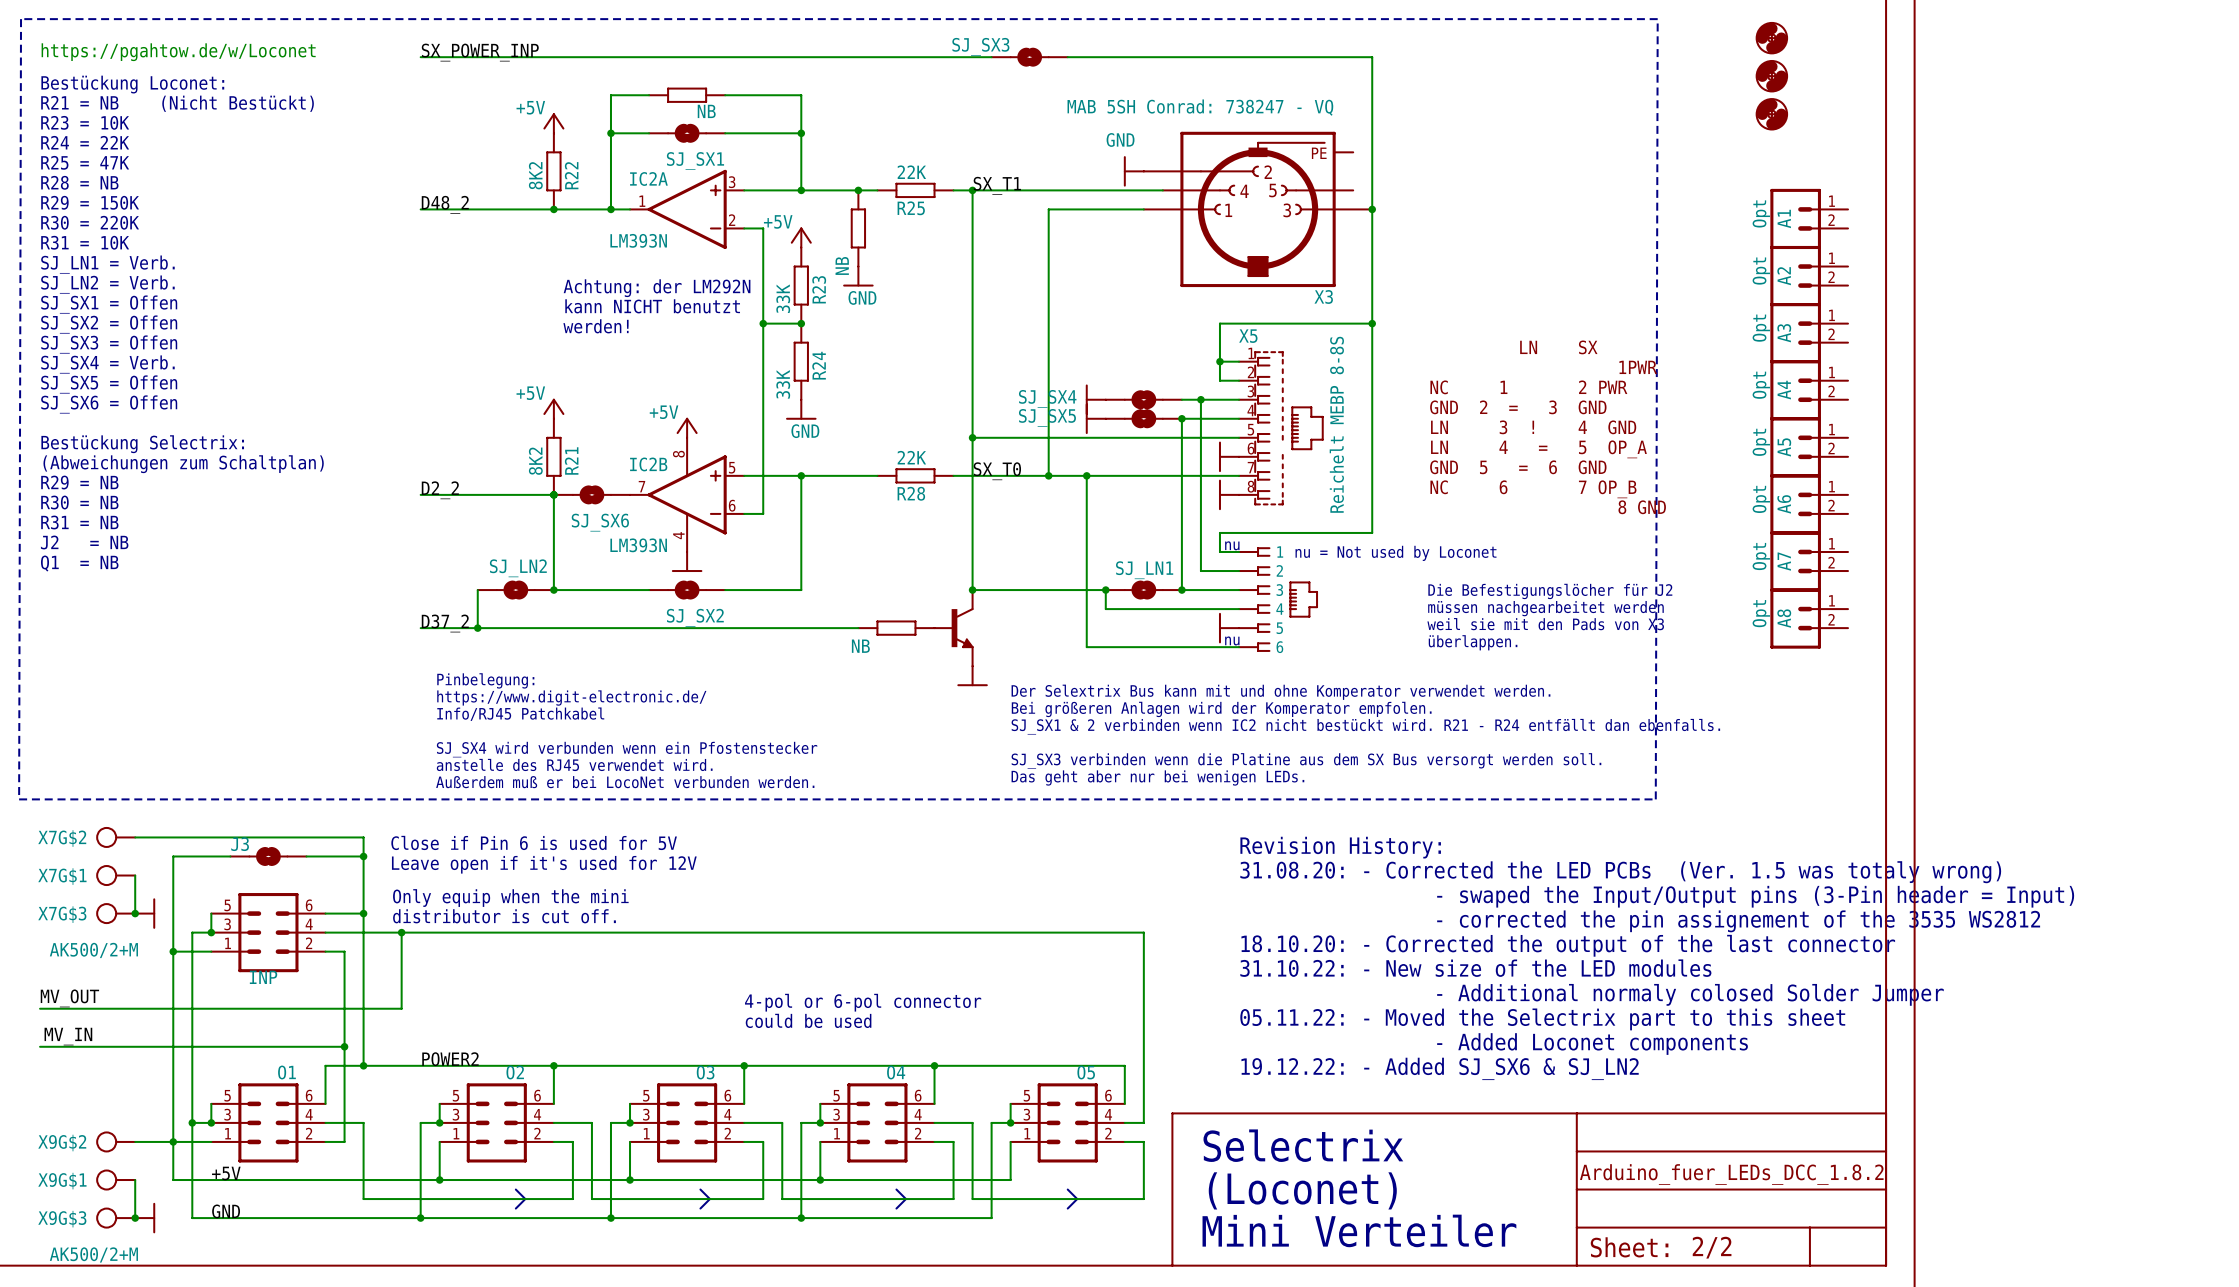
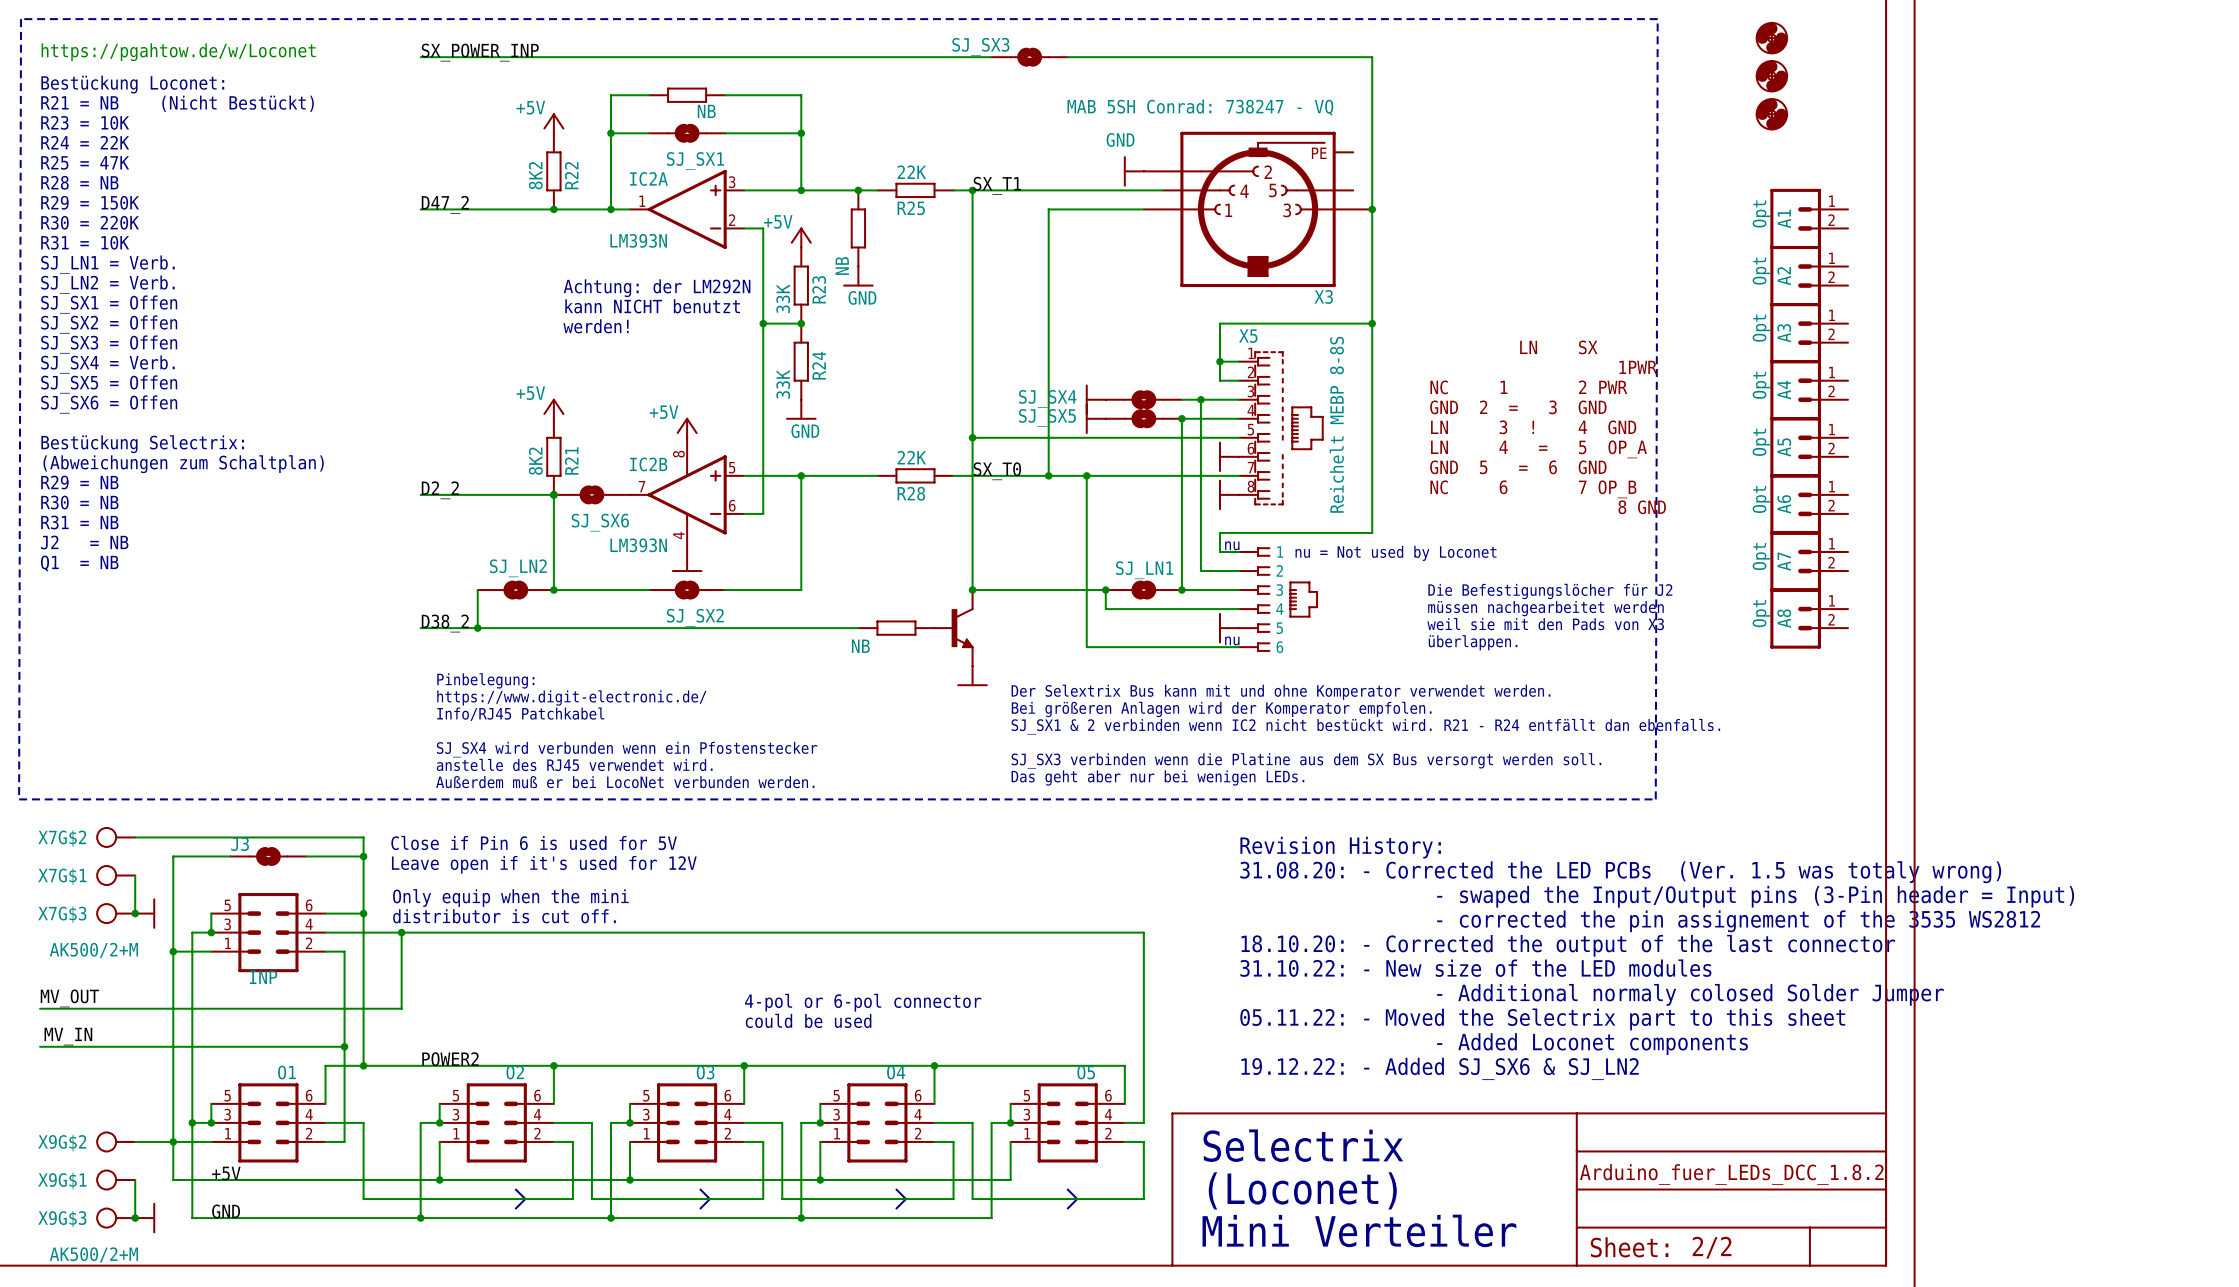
label: D48_2 (445, 204) -> D47_2 (445, 204)
label: D37_2 (445, 623) -> D38_2 (445, 623)

